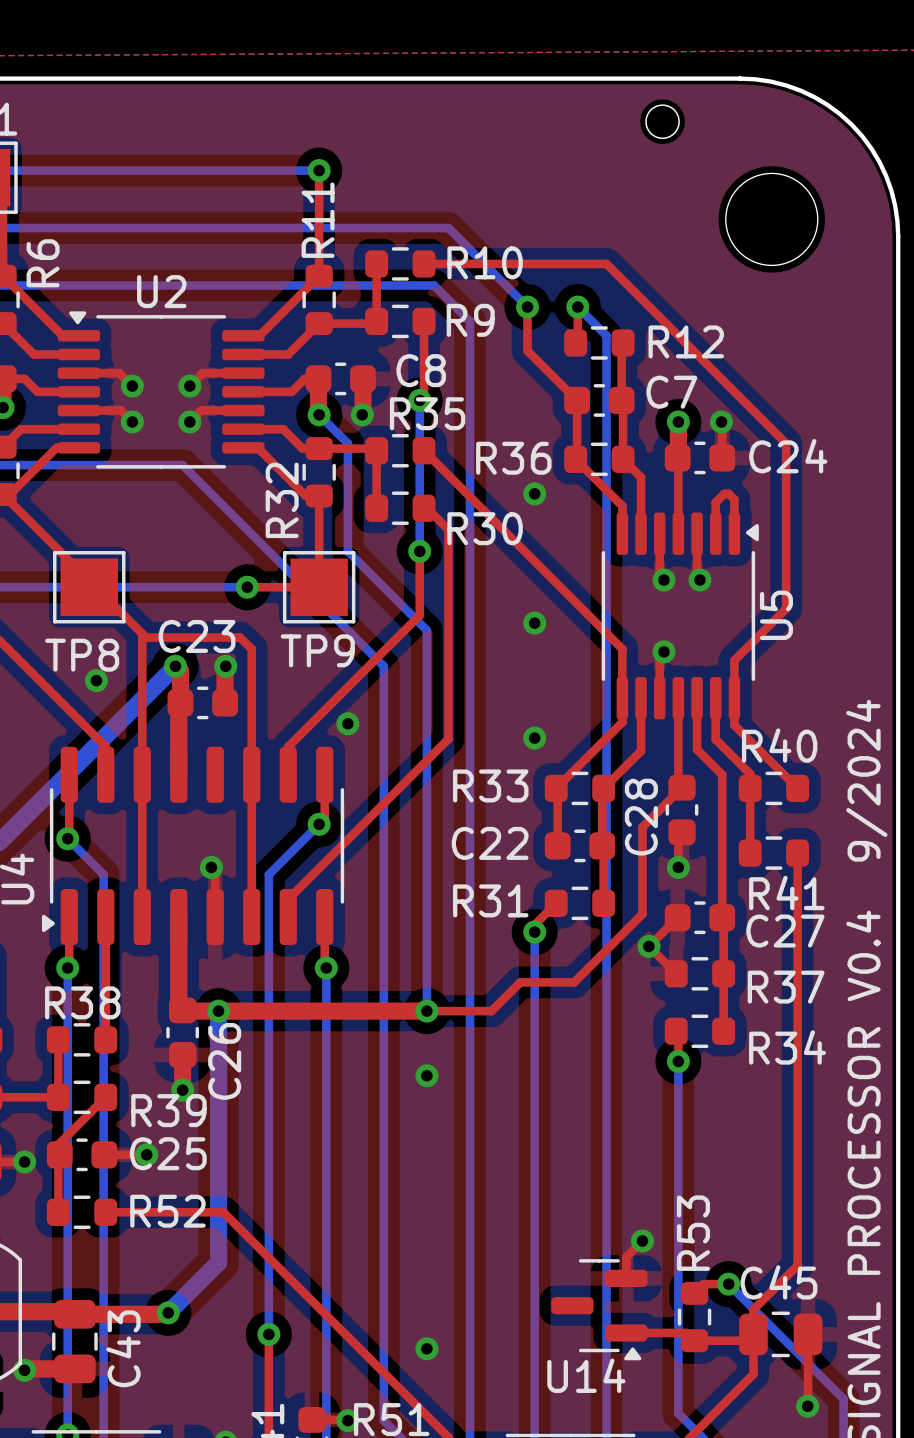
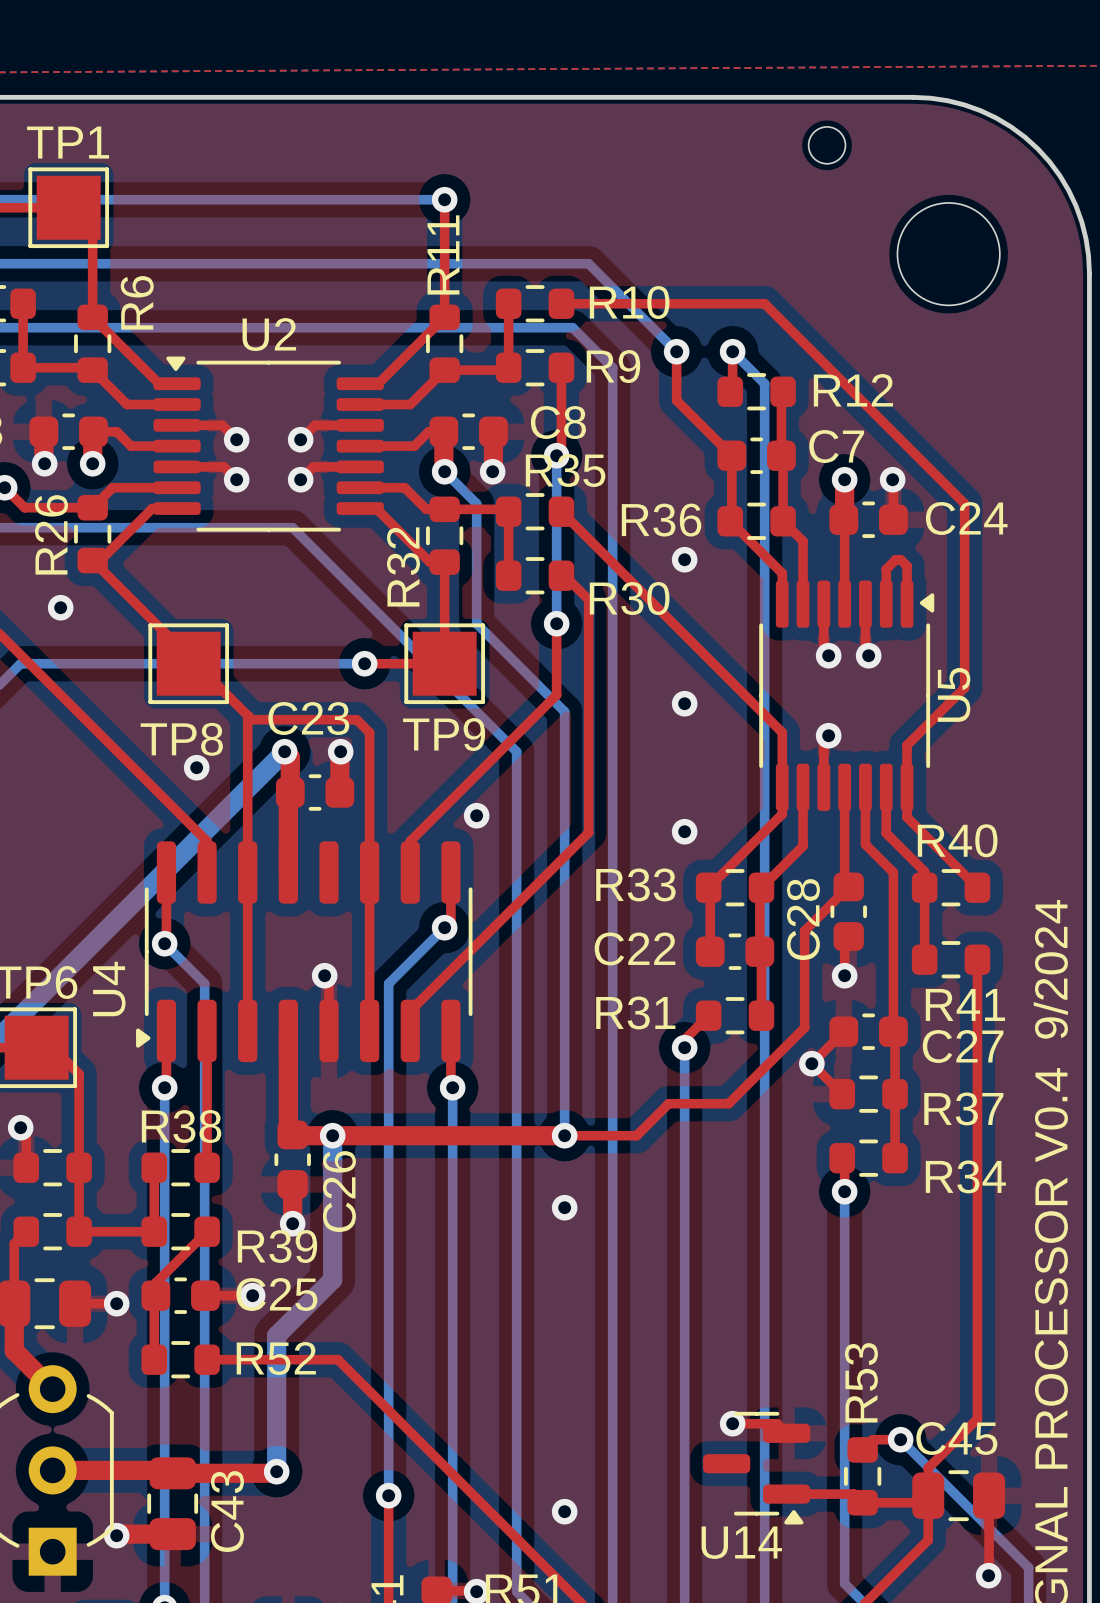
bottom track: (218, 1140) (218, 1262) (168, 1312) -> (332, 1279) (276, 1335) (276, 1471)
top track: (642, 1241) (626, 1257) (626, 1278) -> (732, 1423) (777, 1423) (786, 1433)
via position: (642, 1241) -> (732, 1423)

